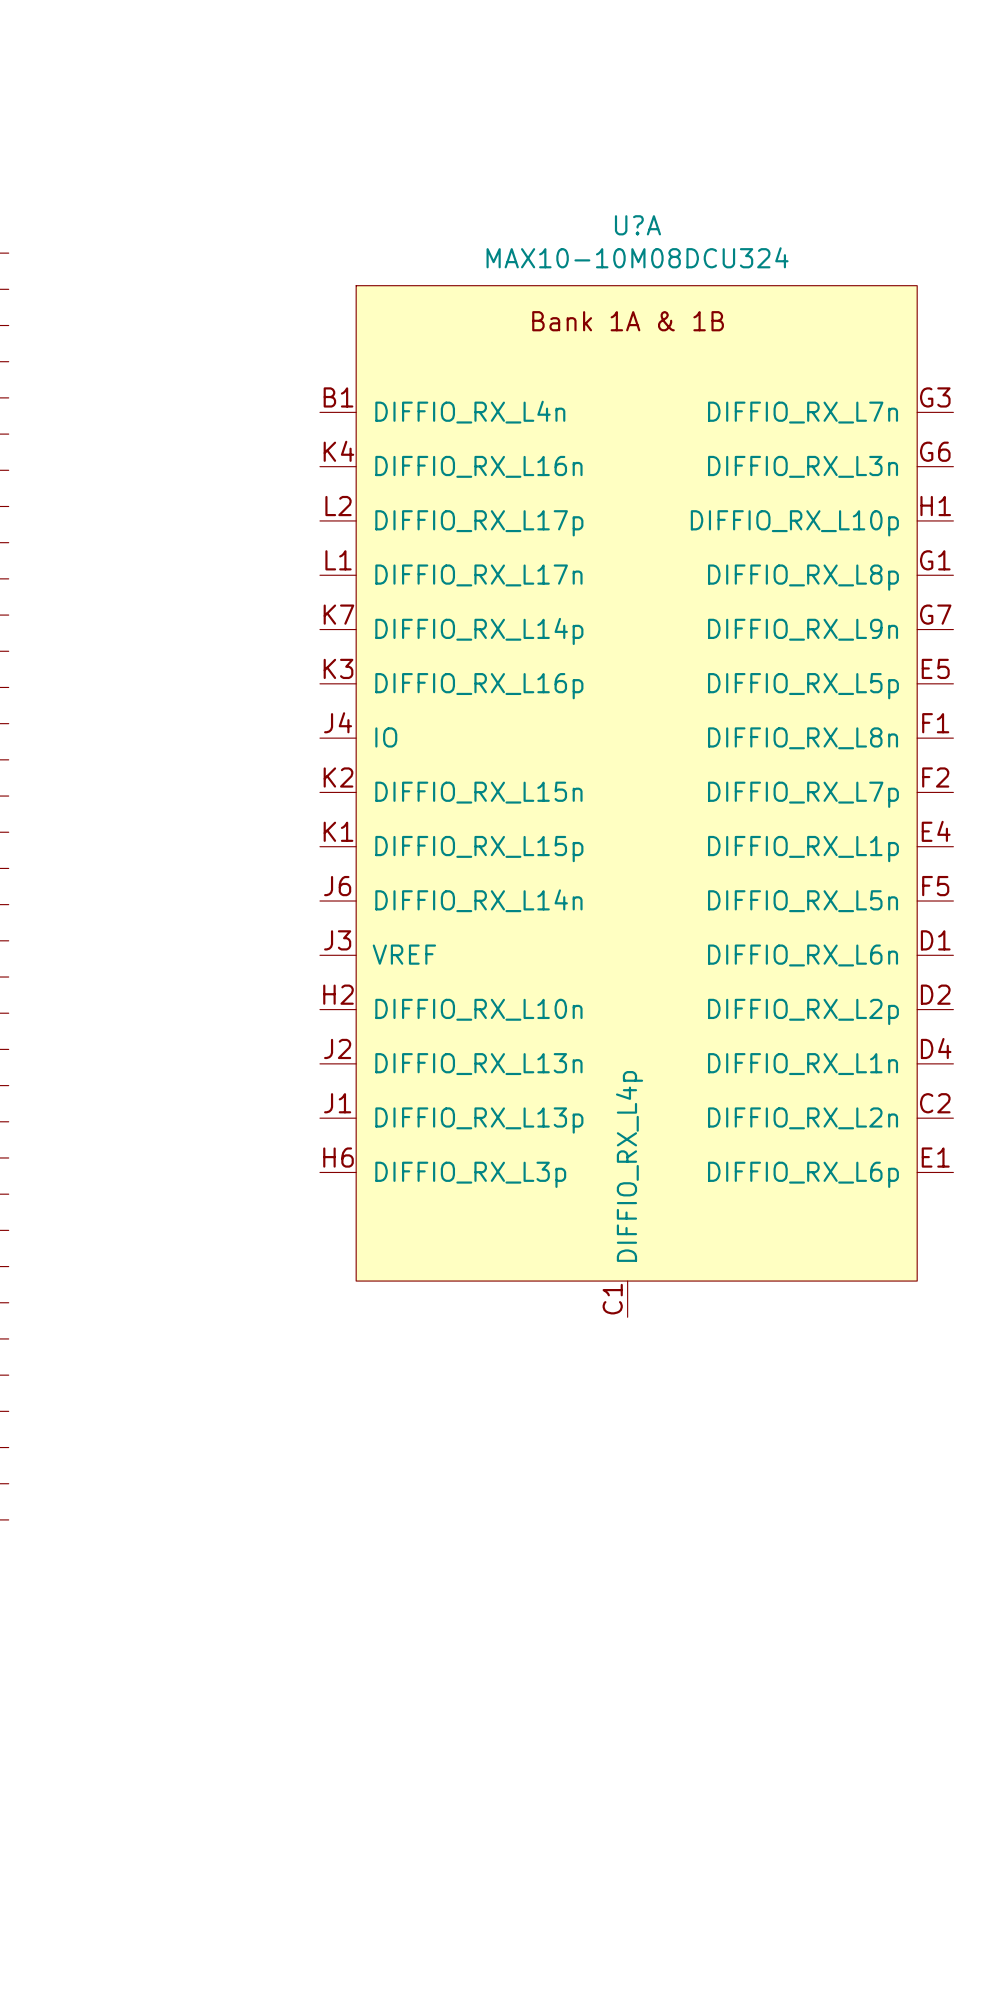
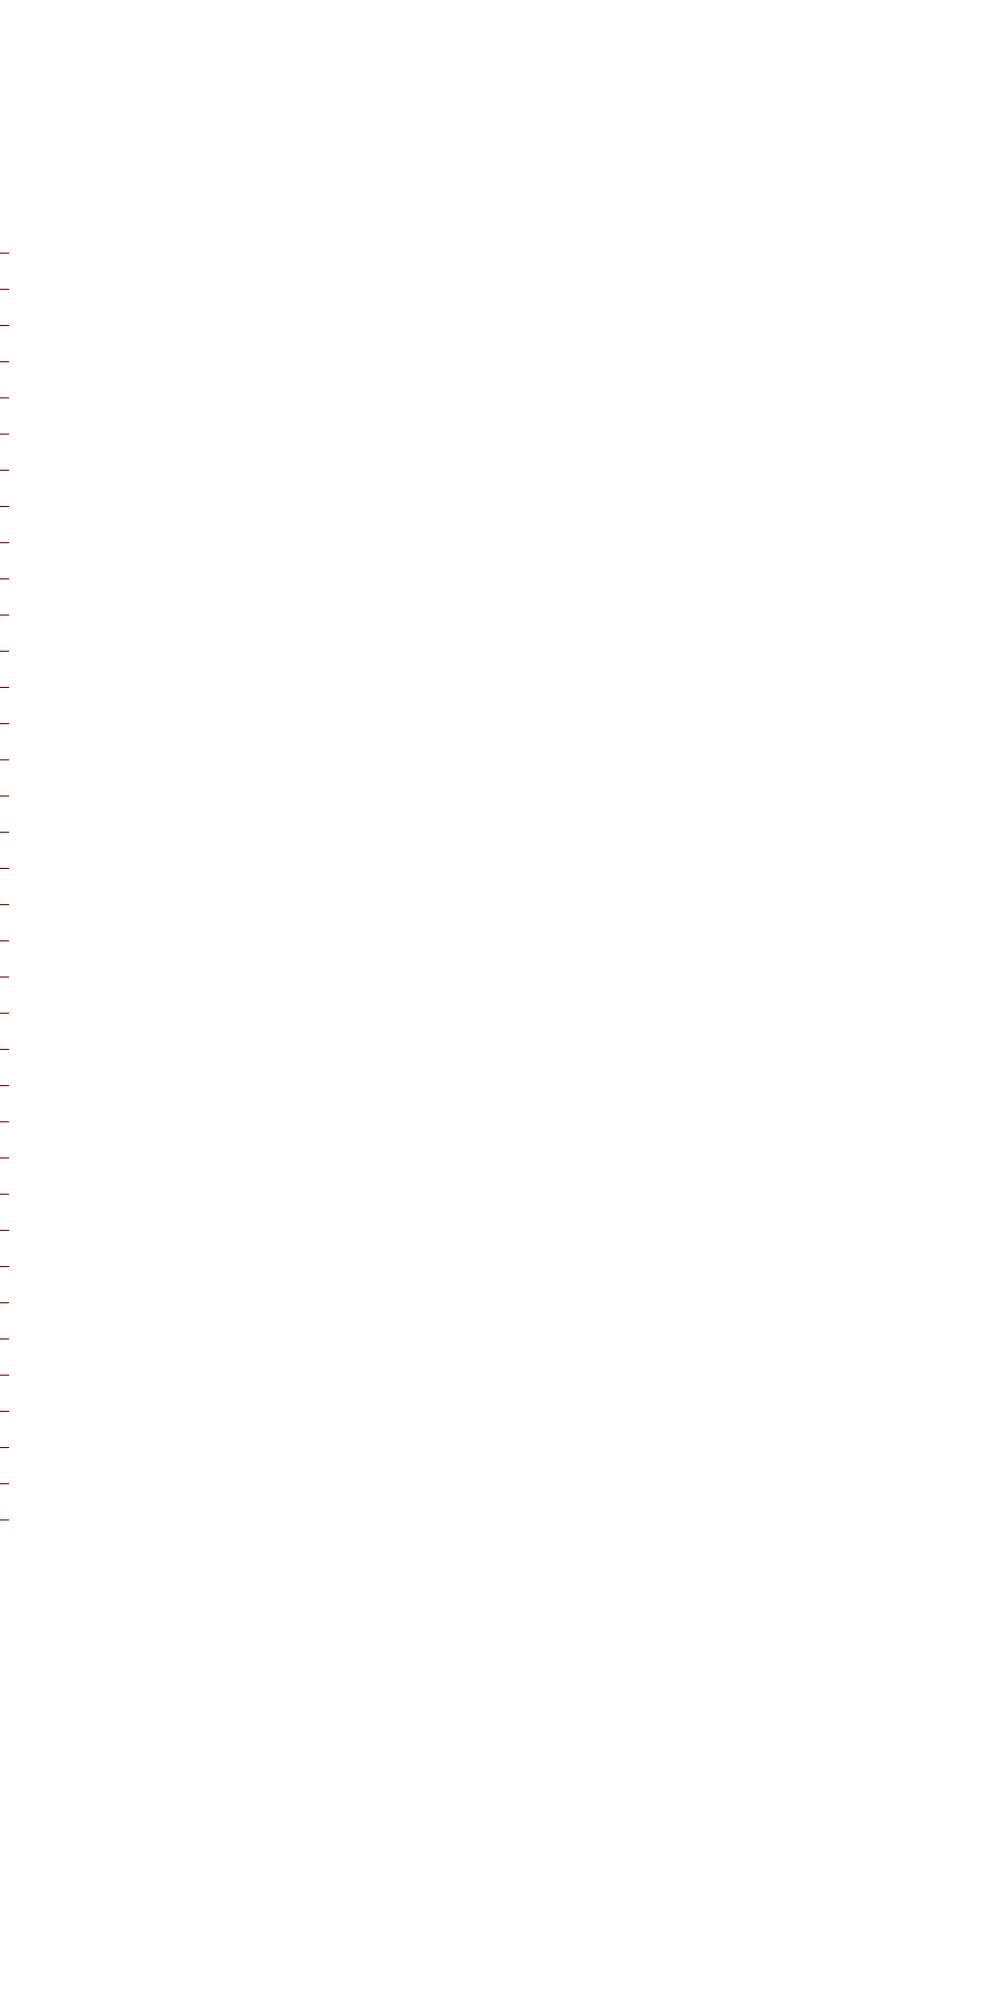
U?A: MAX10-10M08DCU324 (636, 801) -> none

